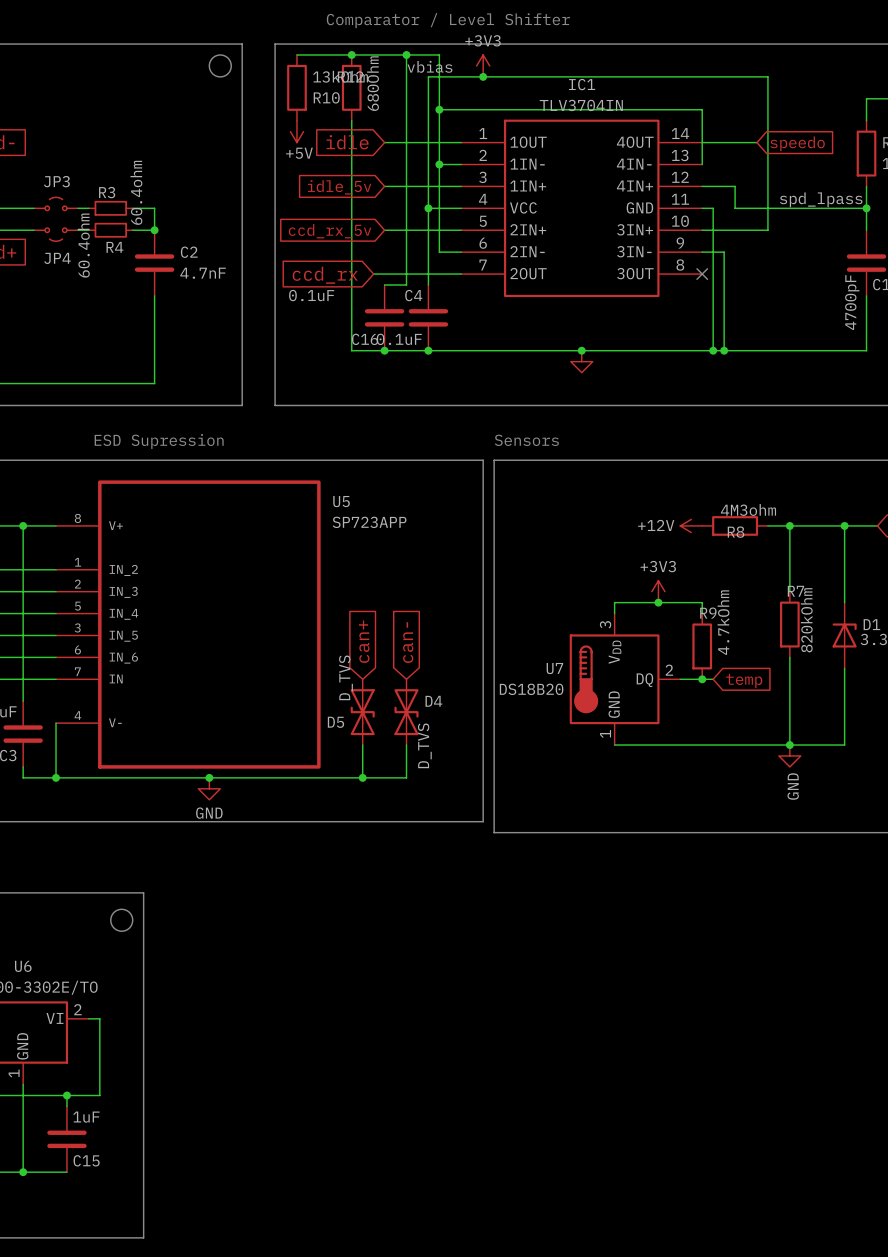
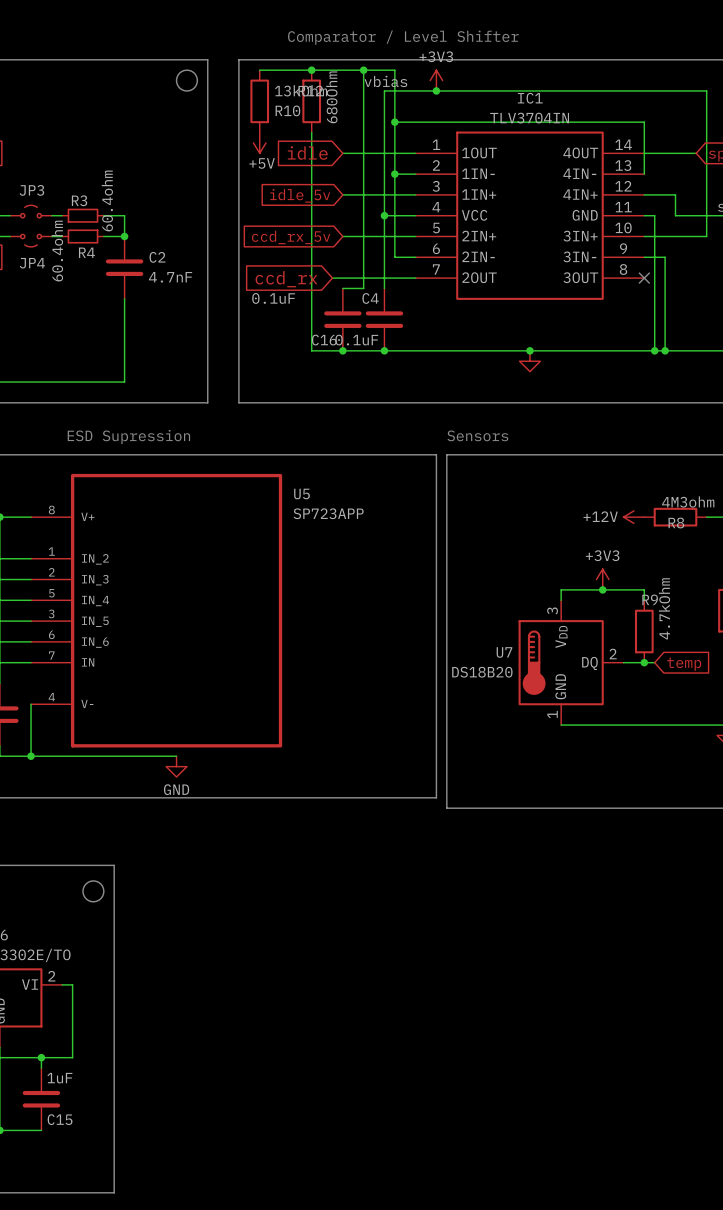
global label: can+ (364, 641) -> none
global label: can- (408, 642) -> none
D5: D_TVS (362, 712) -> none
D4: D_TVS (406, 712) -> none
wire: (362, 745) (362, 777) -> none
wire: (406, 745) (406, 777) (209, 777) -> none
junction: (209, 777) -> none
junction: (362, 777) -> none

